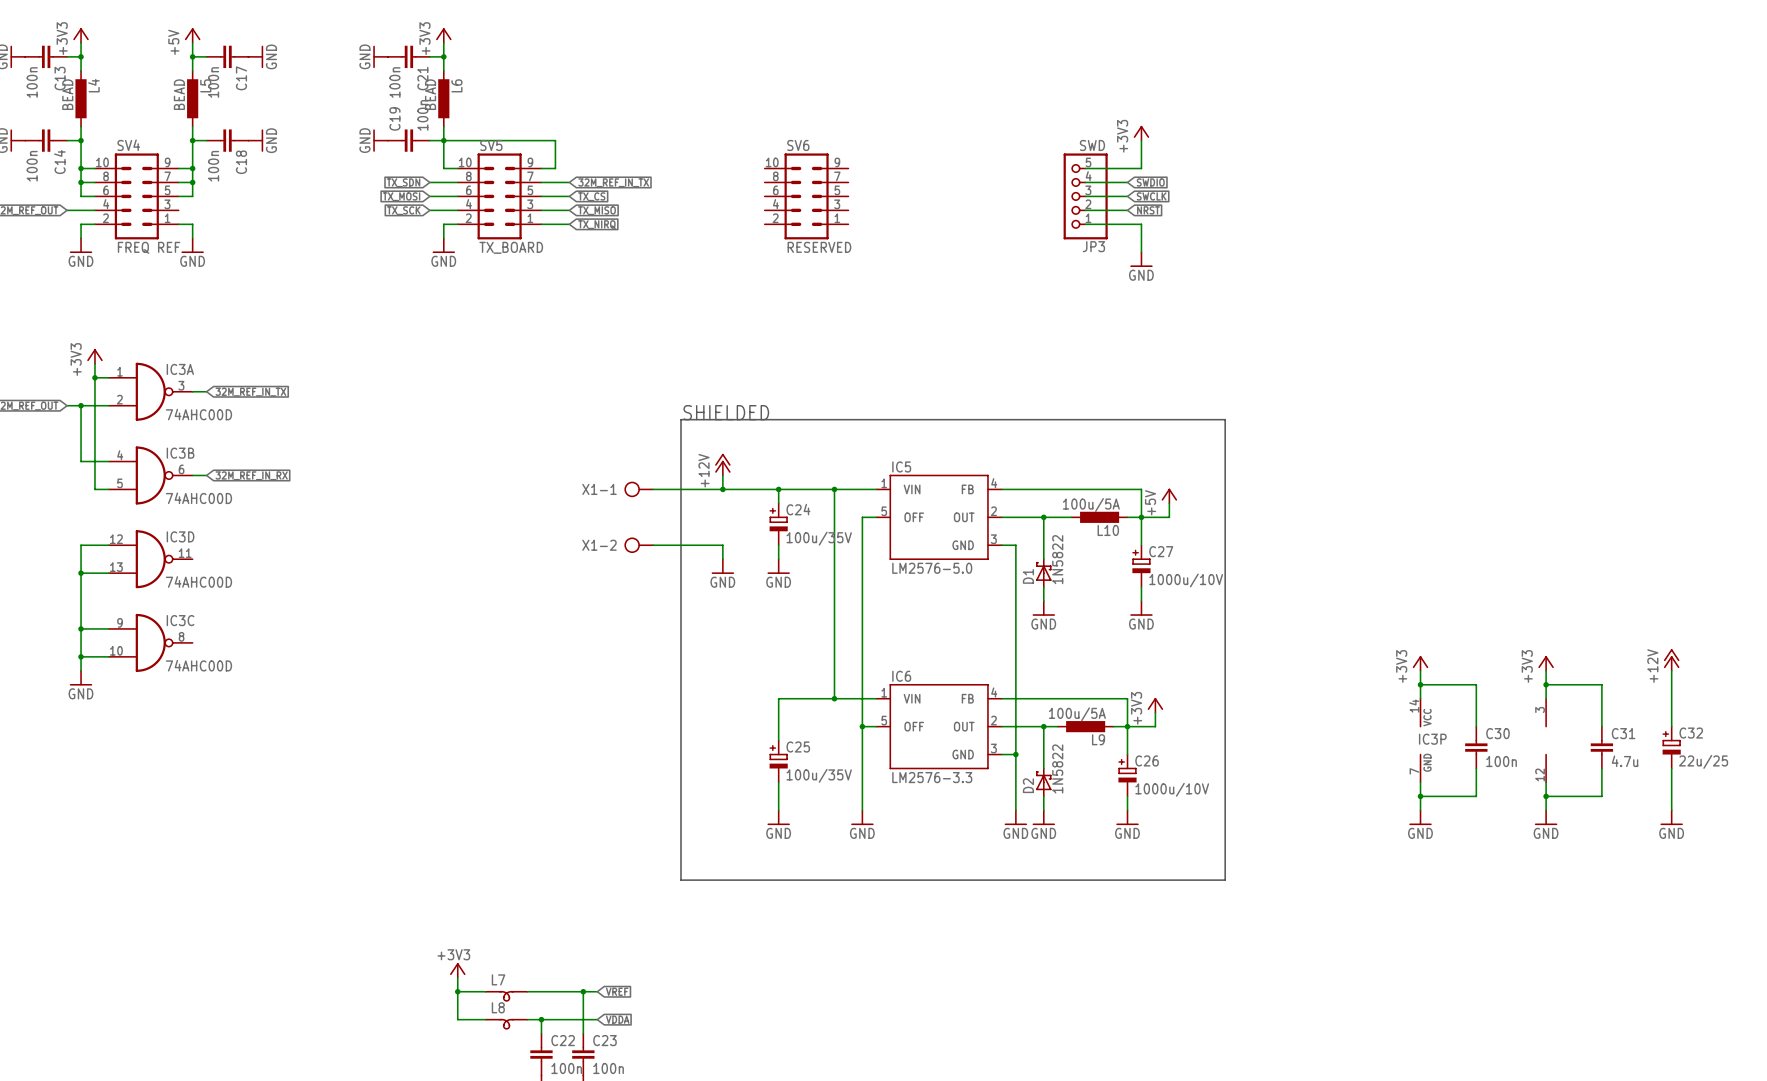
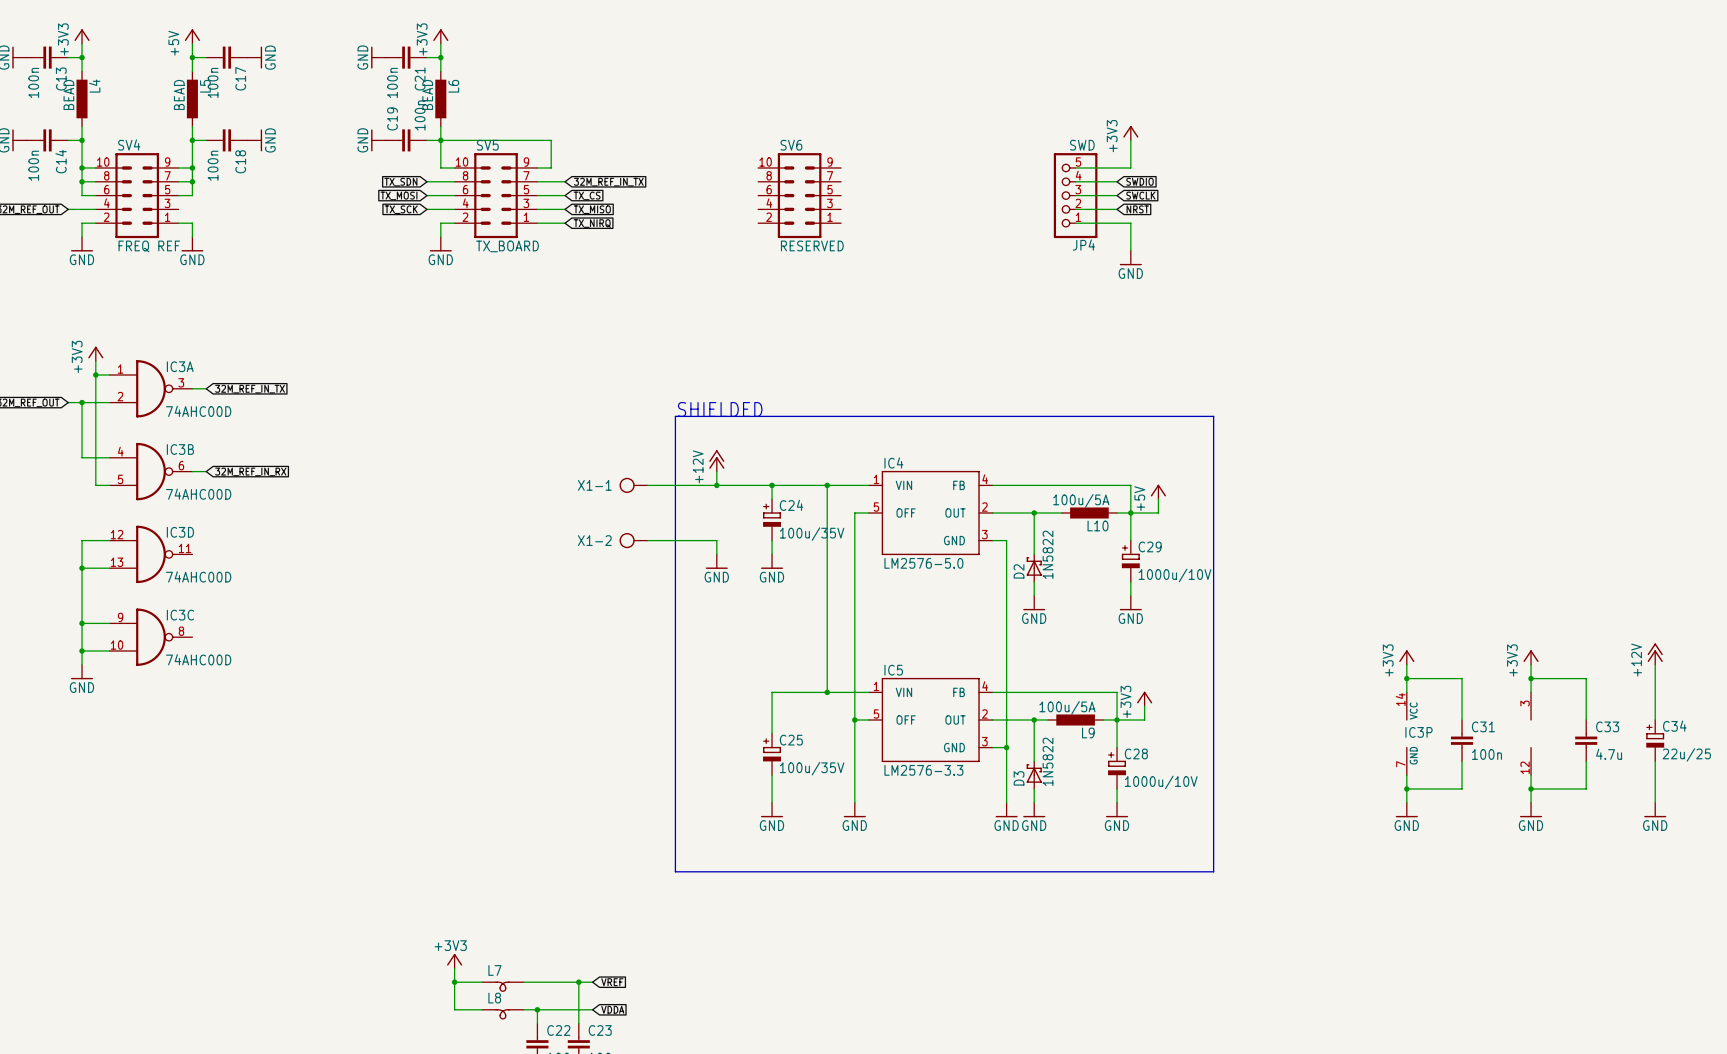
JP3 name: JP3 (1093, 246) -> JP4 (1084, 245)
IC5 name: IC5 (901, 466) -> IC4 (893, 462)
C27 name: C27 (1161, 551) -> C29 (1150, 546)
D1 name: D1 (1028, 576) -> D2 (1019, 571)
IC6 name: IC6 (901, 676) -> IC5 (893, 670)
C30 name: C30 (1497, 733) -> C31 (1483, 726)
C31 name: C31 (1623, 733) -> C33 (1607, 726)
C32 name: C32 (1691, 733) -> C34 (1674, 726)
C26 name: C26 (1147, 760) -> C28 (1136, 753)
D2 name: D2 (1028, 785) -> D3 (1019, 778)

